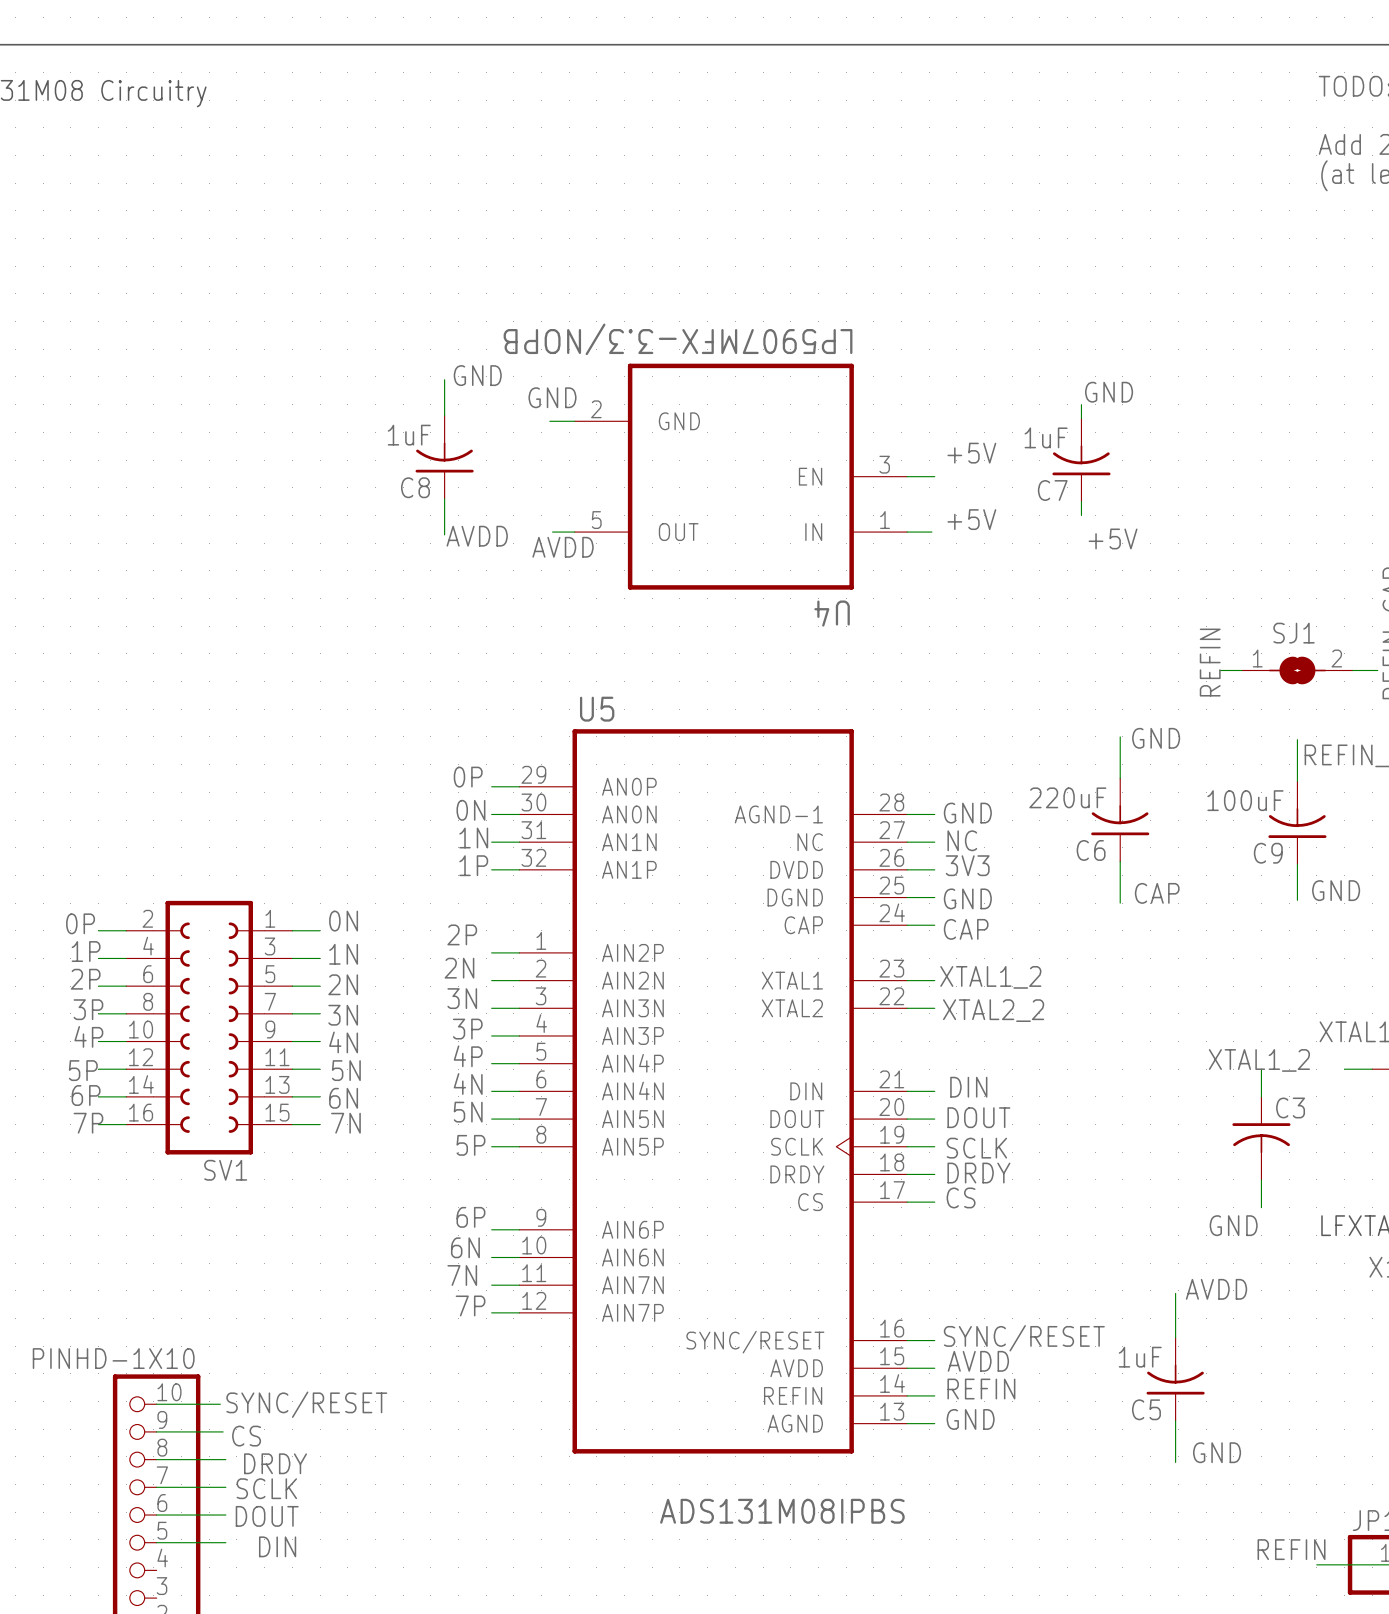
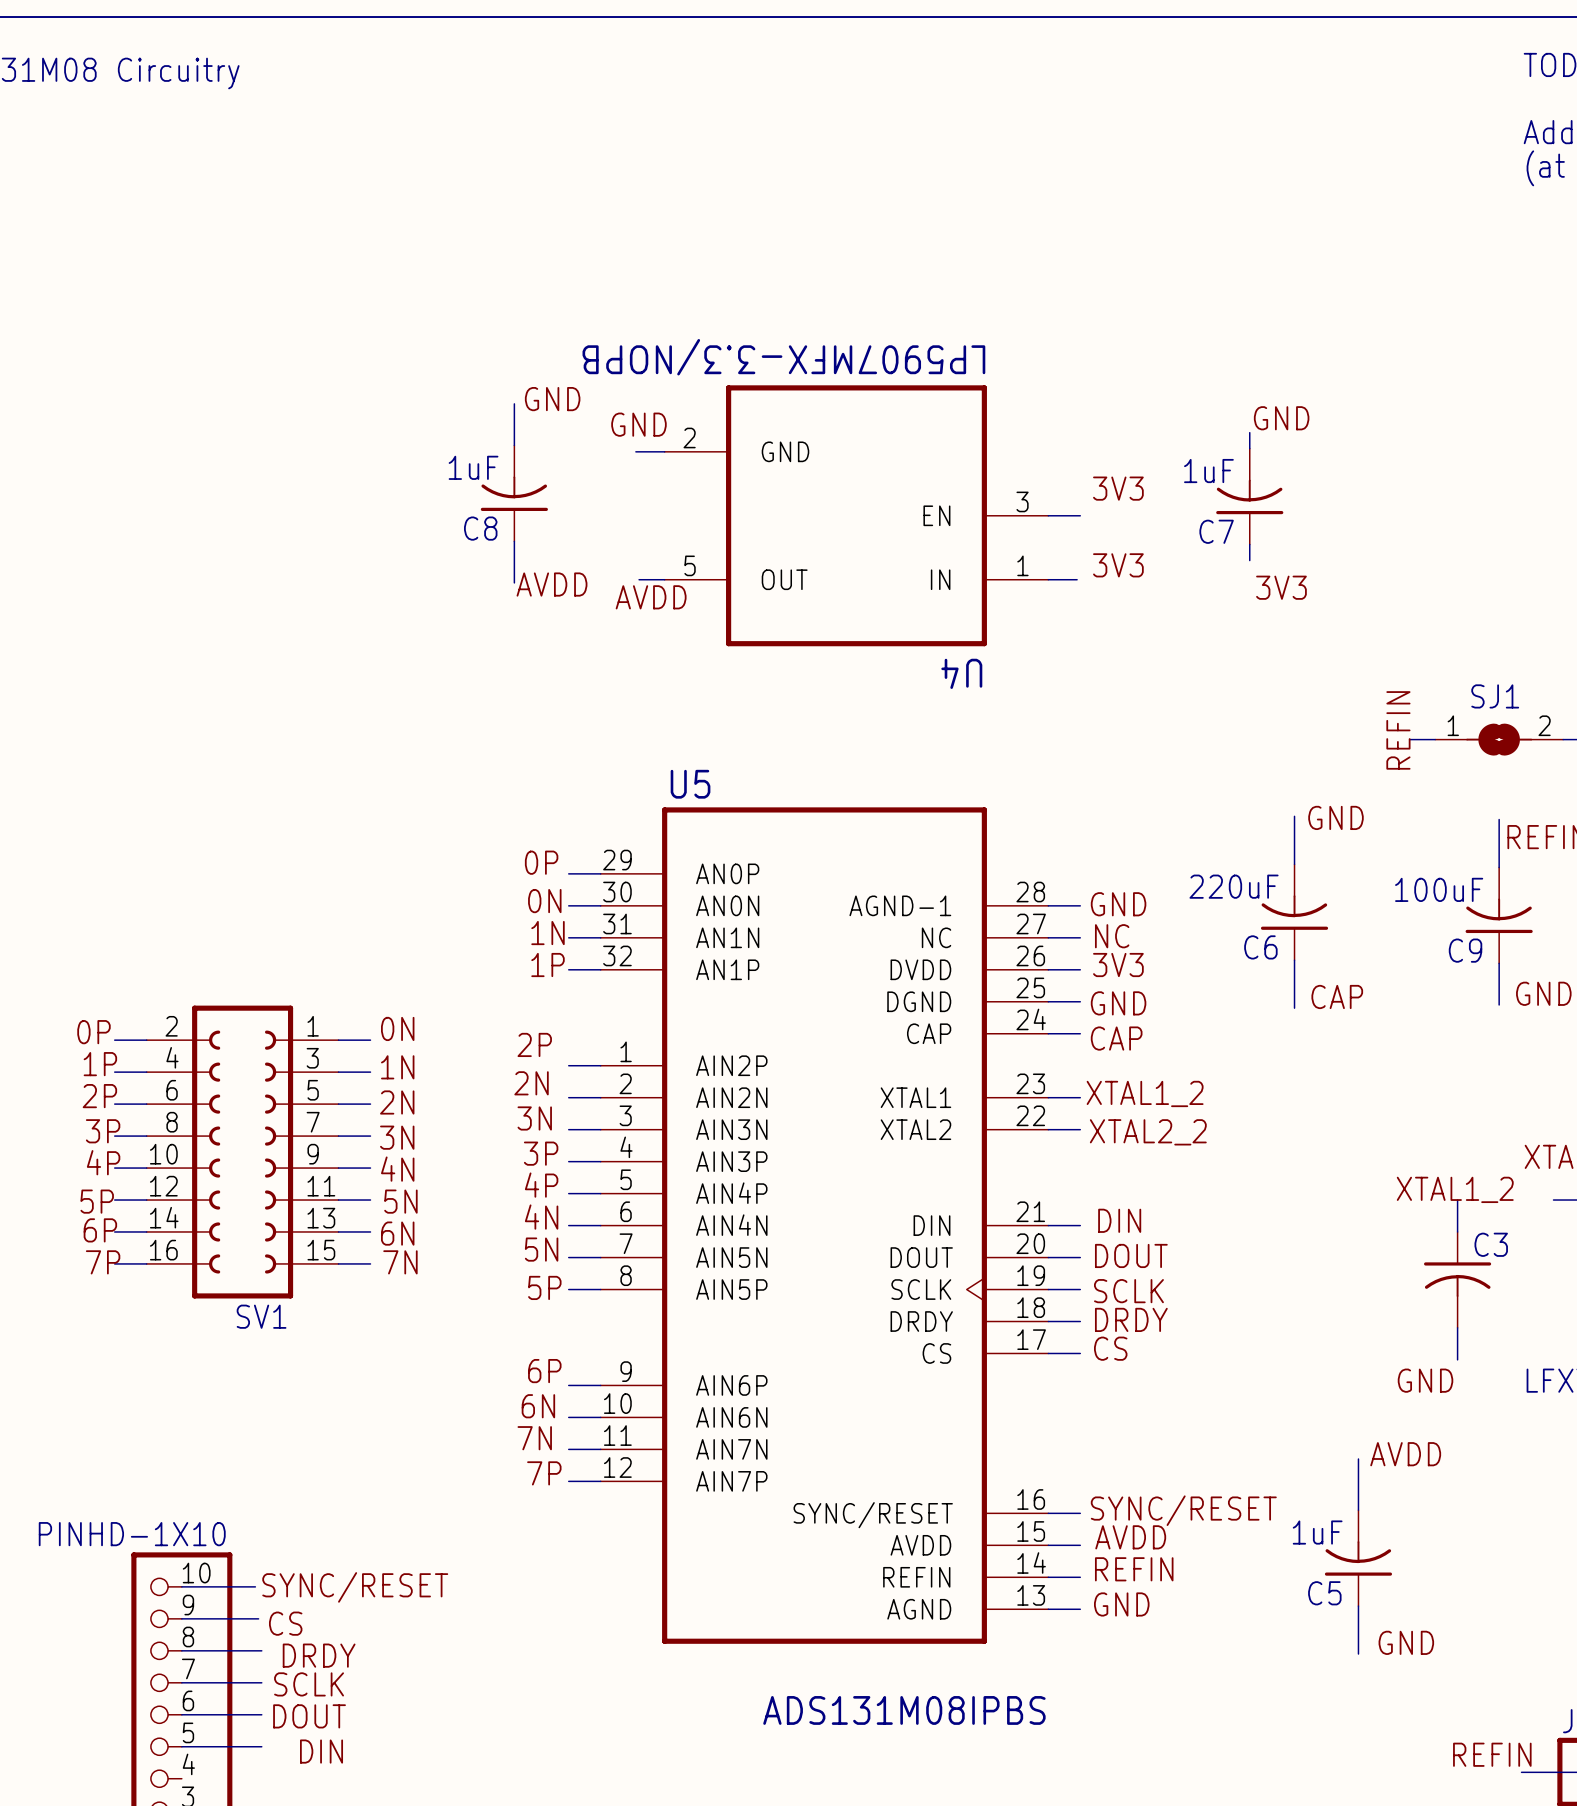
label: +5V (971, 453) -> 3V3 (1118, 488)
label: +5V (971, 519) -> 3V3 (1118, 565)
label: +5V (1113, 538) -> 3V3 (1281, 587)

